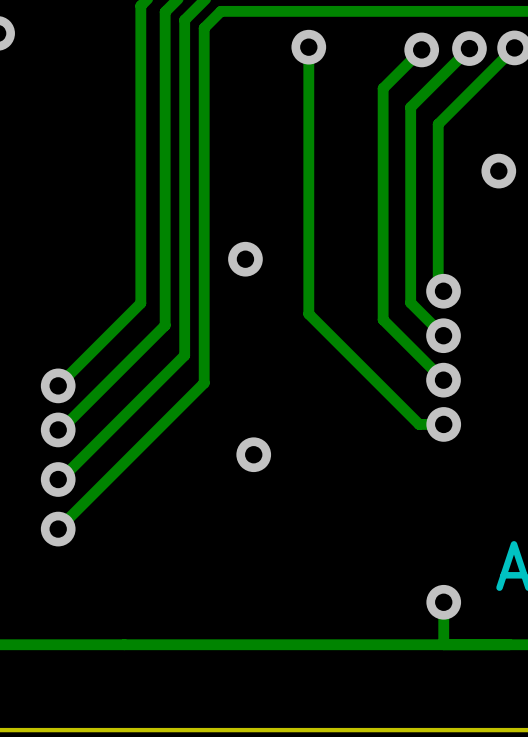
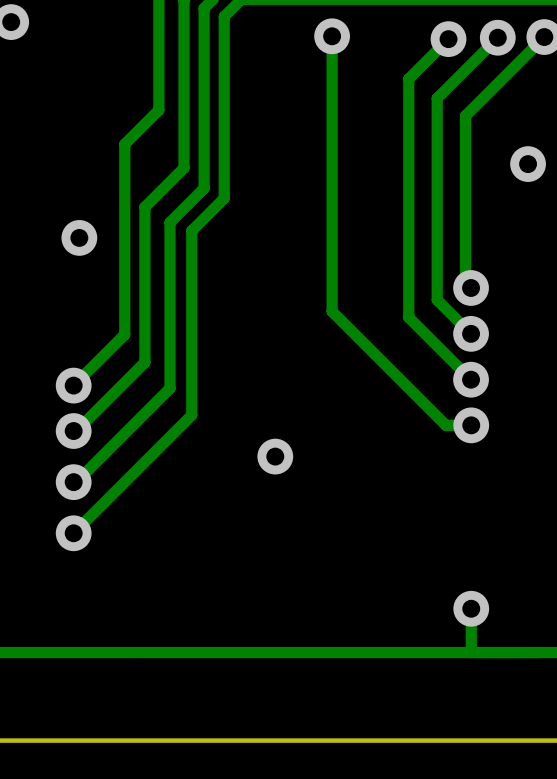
track: (140, 118) (140, 303) (107, 336) -> (158, 110) (124, 144) (124, 334)
track: (165, 174) (165, 325) (127, 363) -> (183, 168) (144, 207) (144, 362)
track: (184, 194) (184, 355) (151, 388) -> (204, 188) (170, 222) (170, 388)
track: (204, 204) (204, 383) (172, 414) -> (224, 198) (191, 230) (191, 415)
via position: (245, 259) -> (79, 237)

